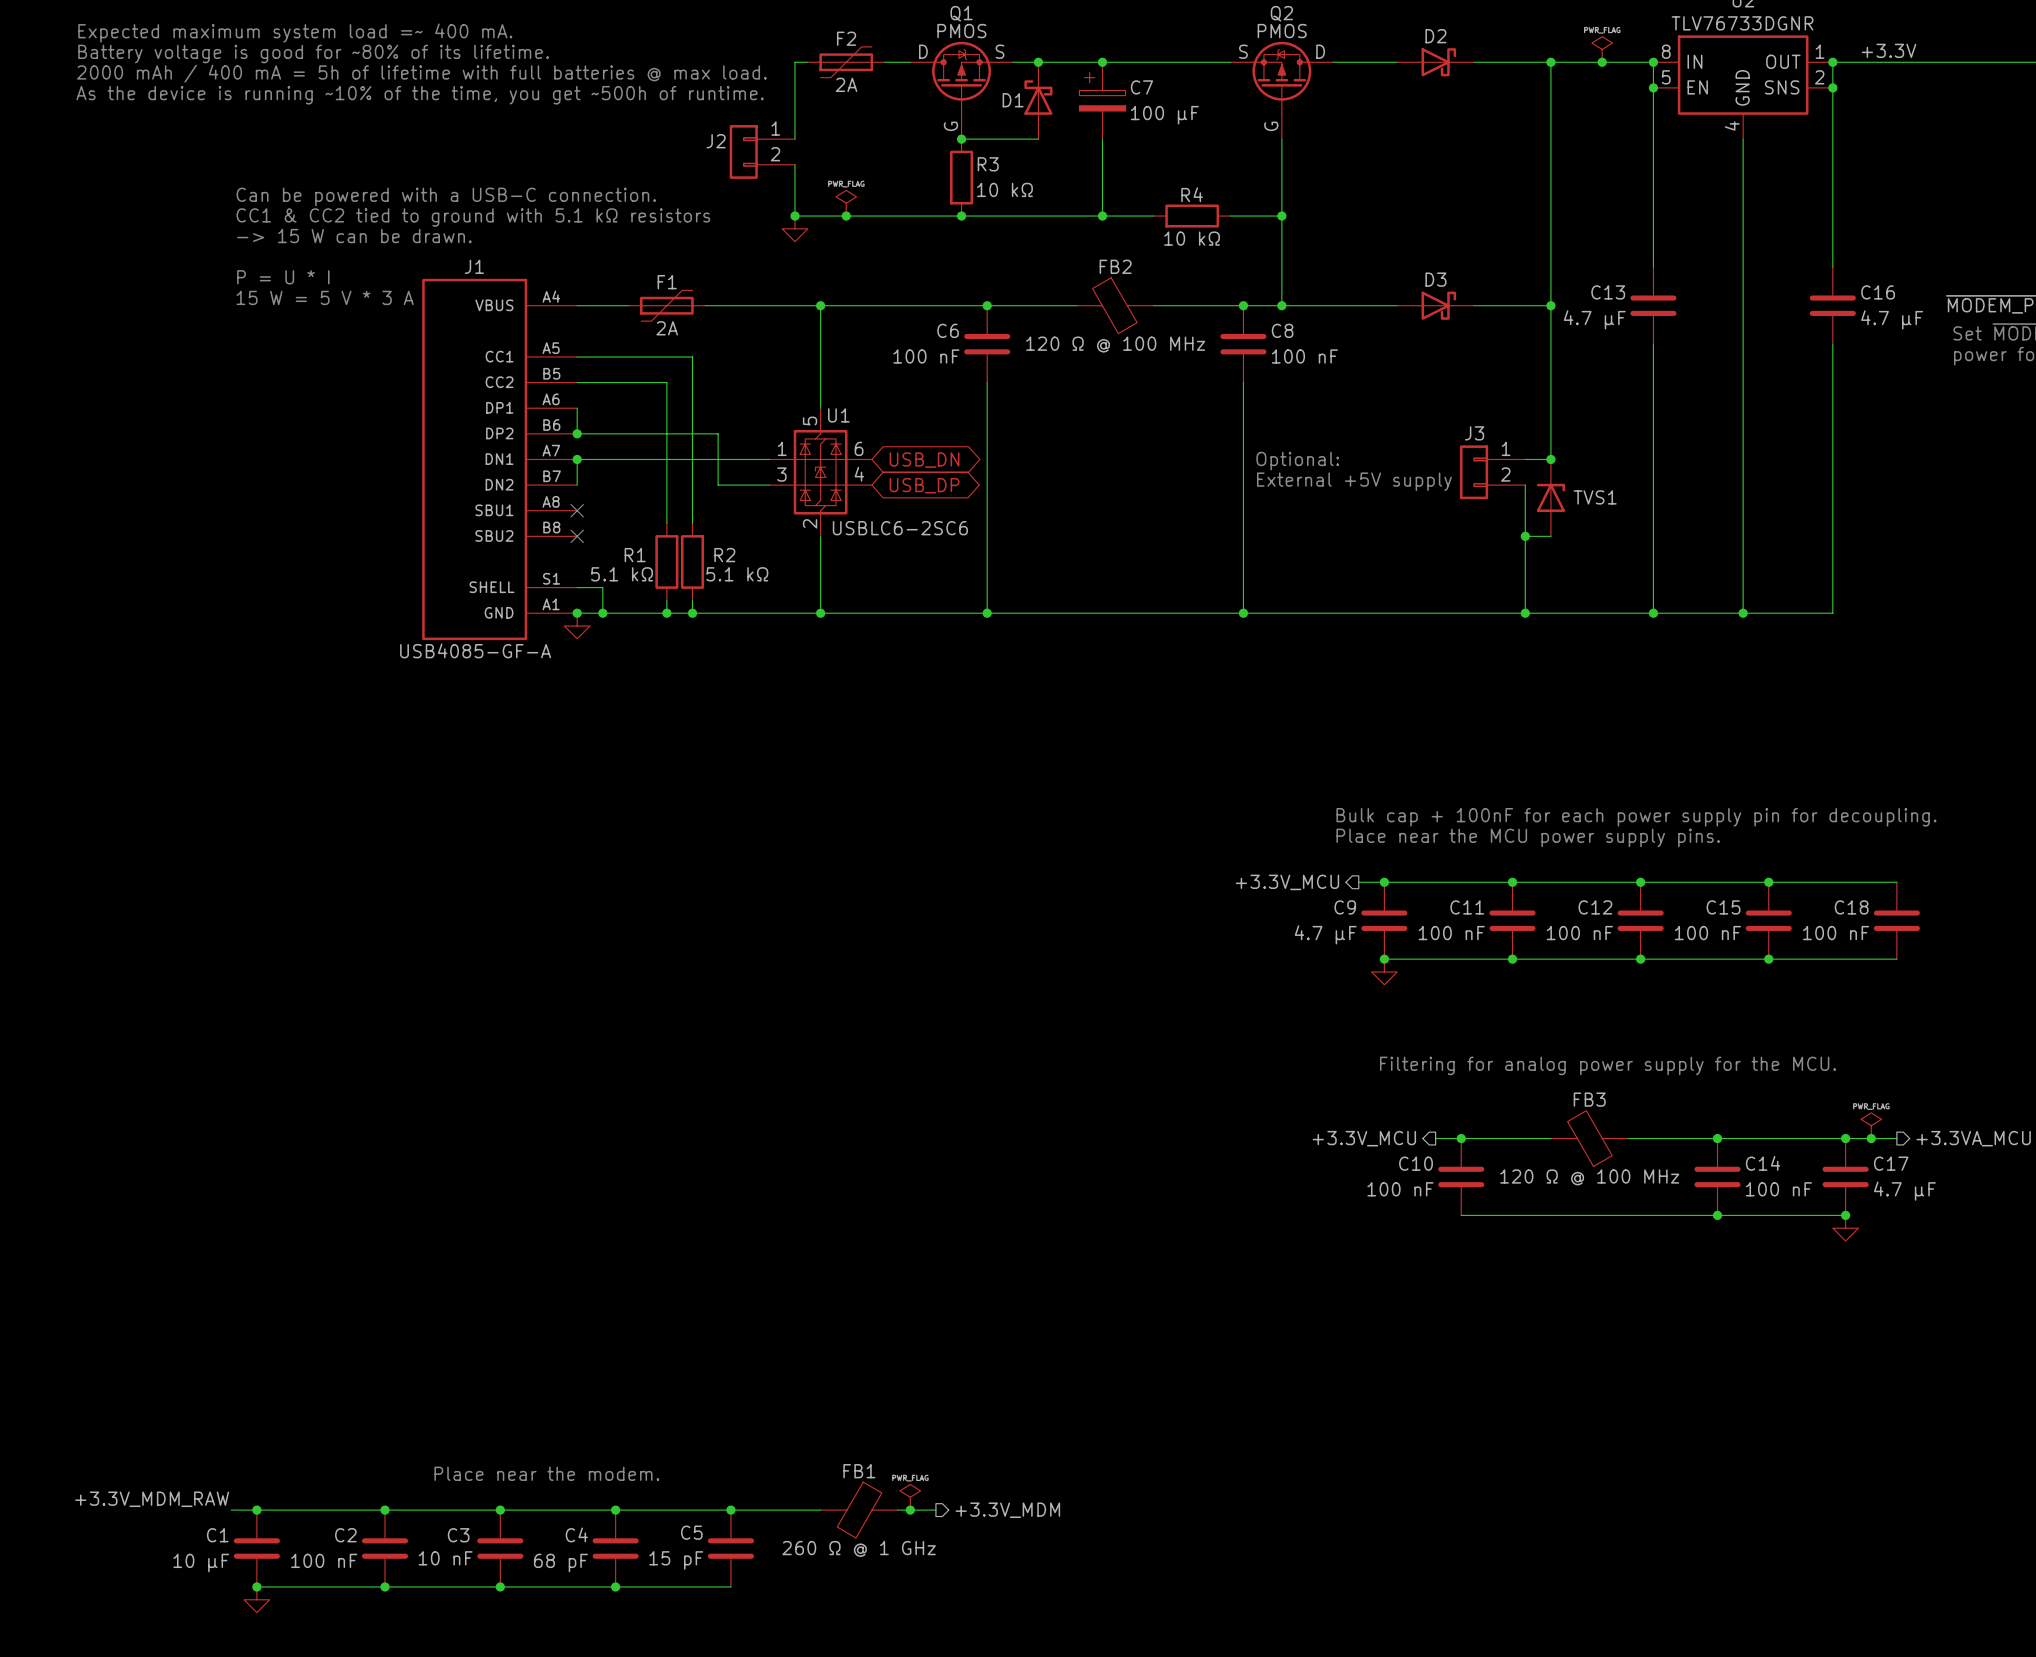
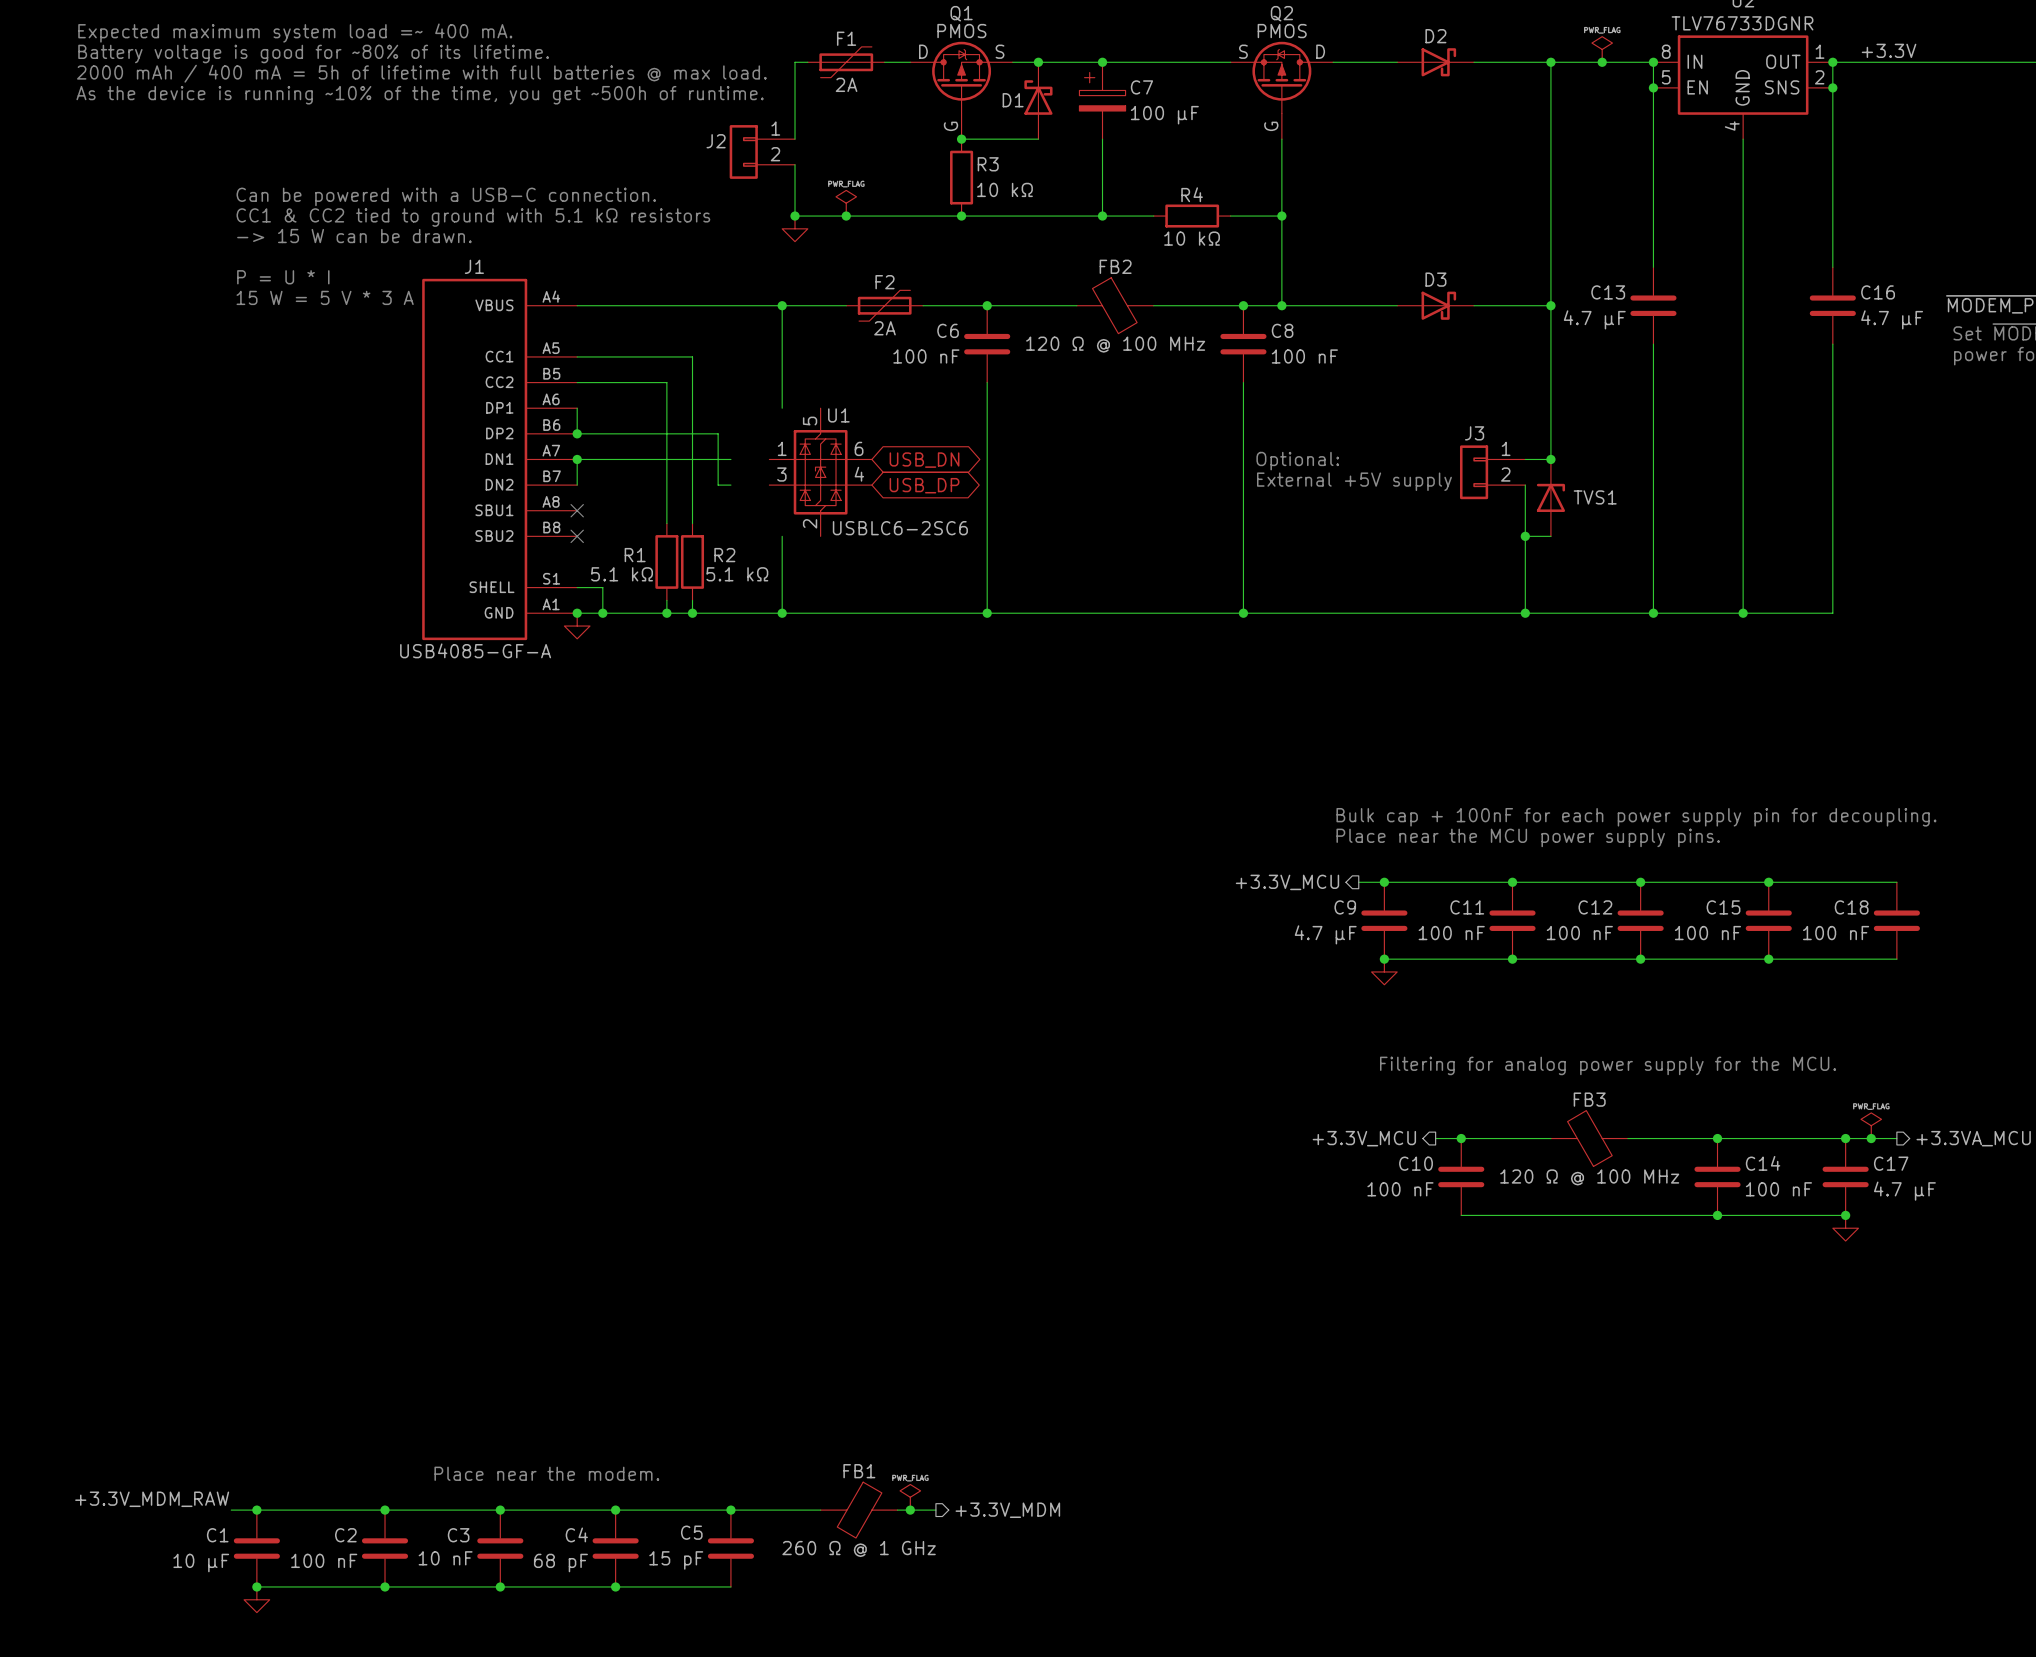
F2 name: F2 (846, 38) -> F1 (846, 38)
F1: 2A (666, 305) -> none
wire: (820, 305) (820, 408) -> (782, 305) (782, 408)
junction position: (820, 305) -> (782, 305)
F2: none -> 2A (884, 305)
wire: (730, 459) (769, 459) -> none
wire: (730, 485) (769, 485) -> none
wire: (820, 536) (820, 613) -> (782, 536) (782, 613)
junction position: (820, 613) -> (782, 613)

